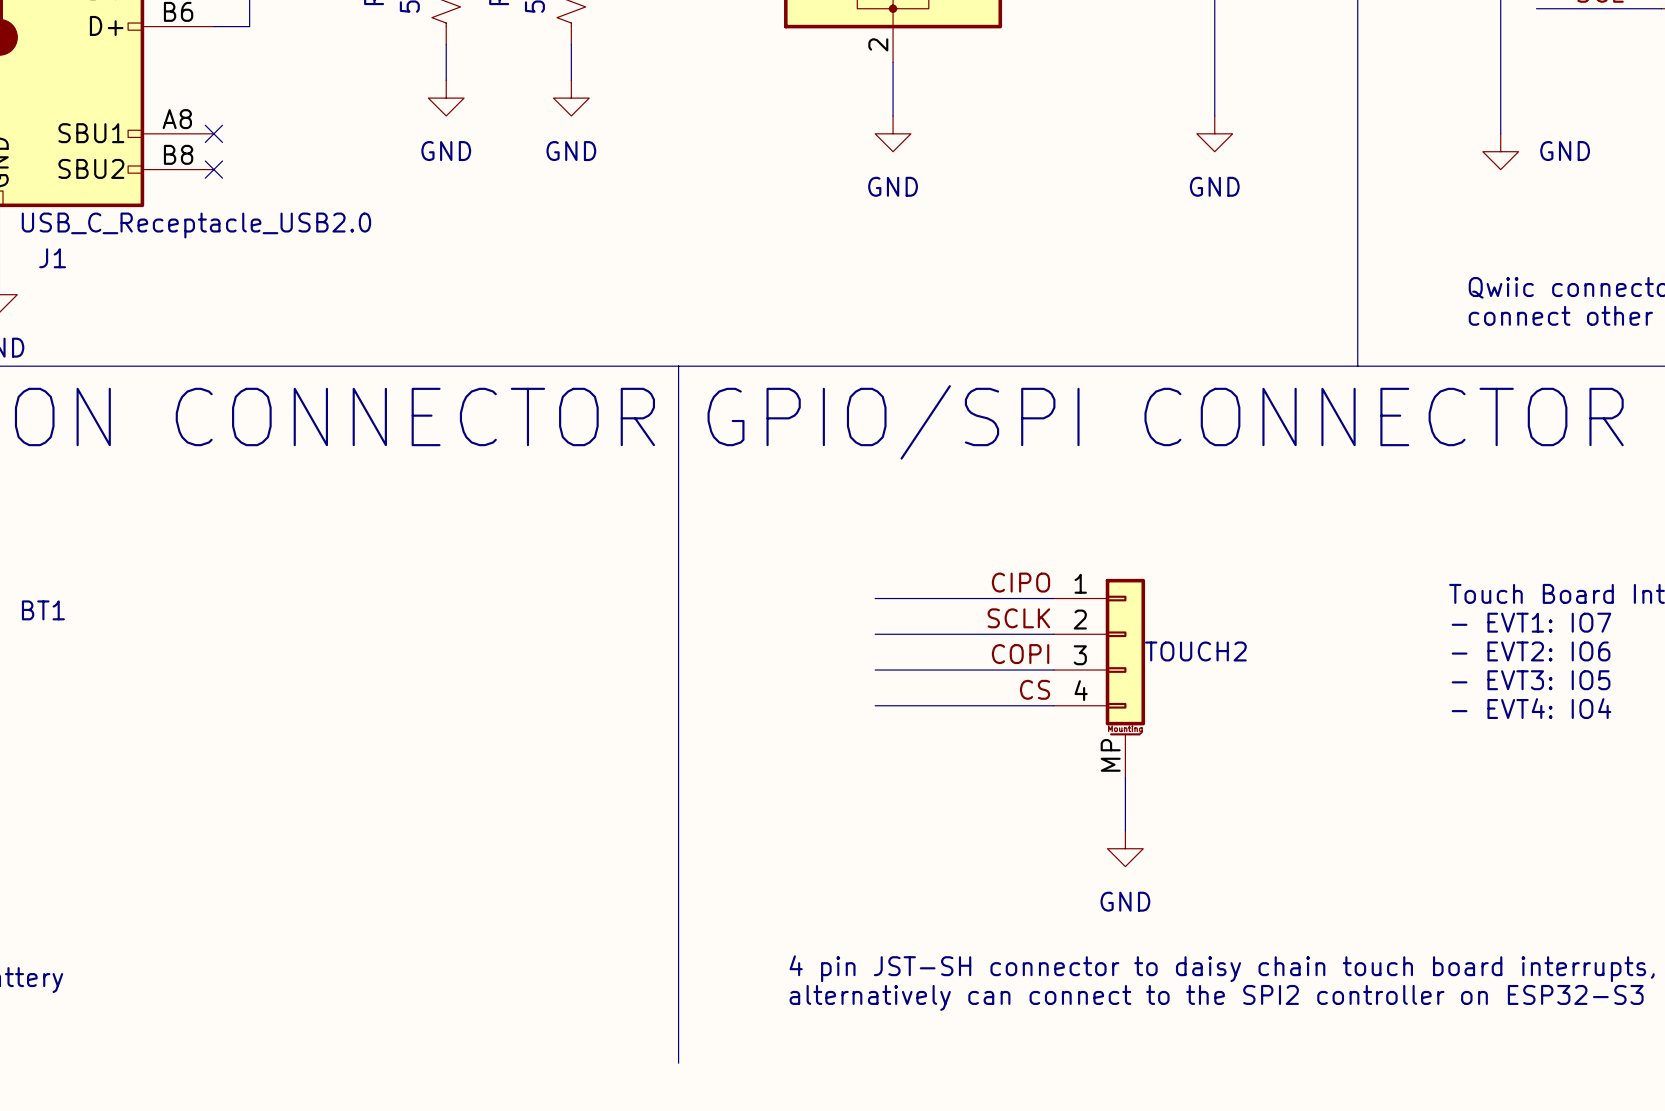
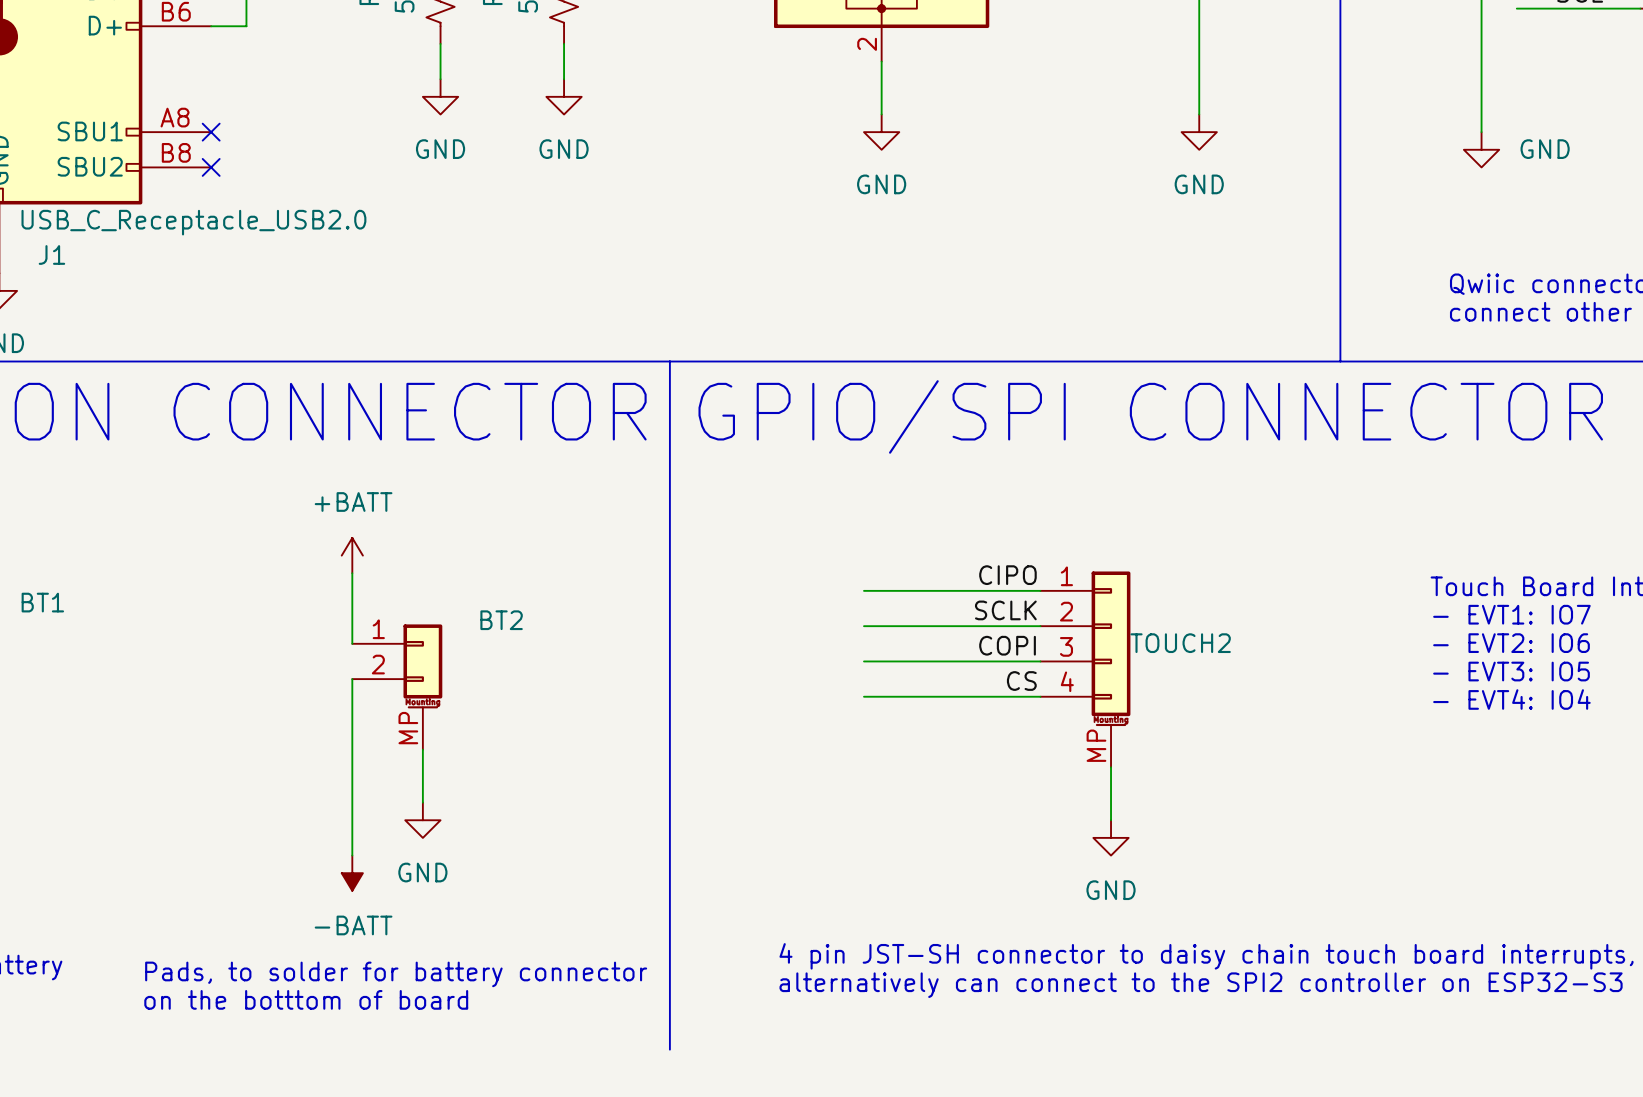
power symbol: none -> +BATT (352, 555)
wire: none -> (352, 573) (352, 643)
wire: none -> (352, 679) (352, 855)
BT2: none -> (397, 687)
wire: none -> (422, 749) (422, 802)
power symbol: none -> GND (422, 820)
power symbol: none -> -BATT (352, 873)
text: none -> Pads, to solder for battery connector (396, 974)
text: none -> on the botttom of board (306, 999)

